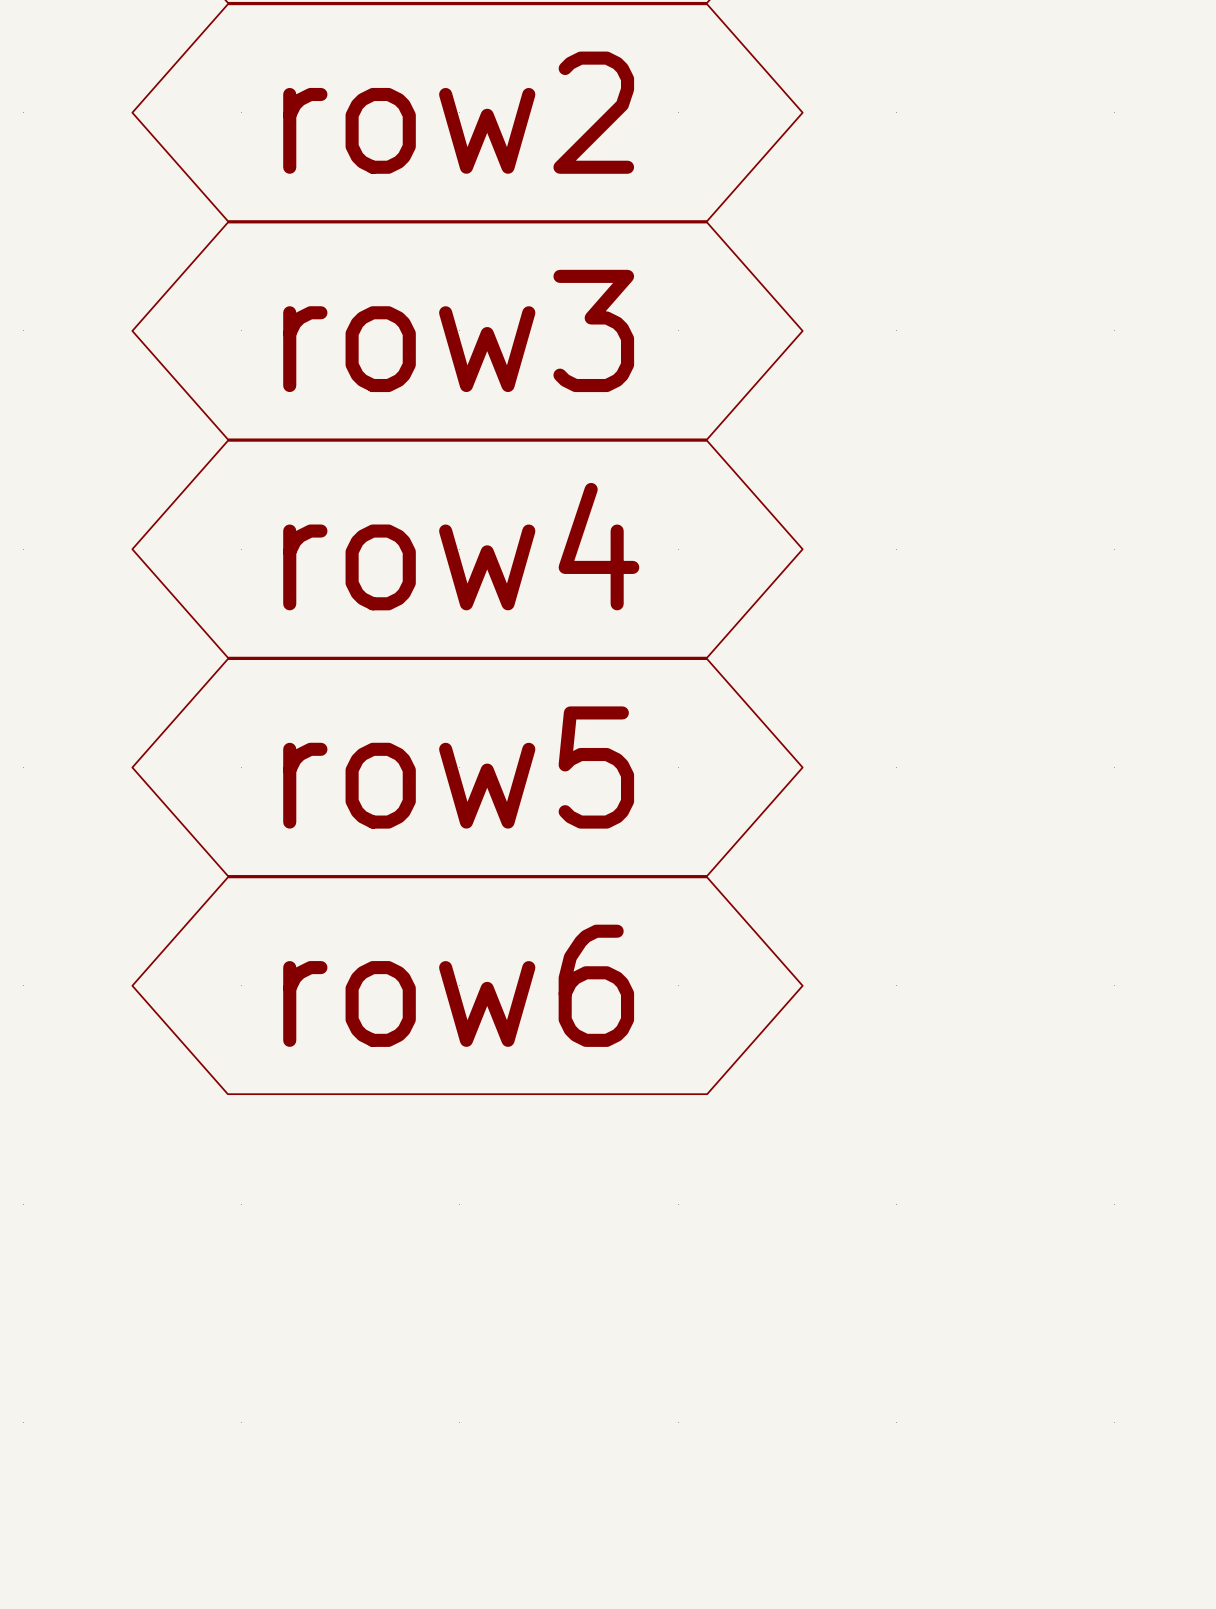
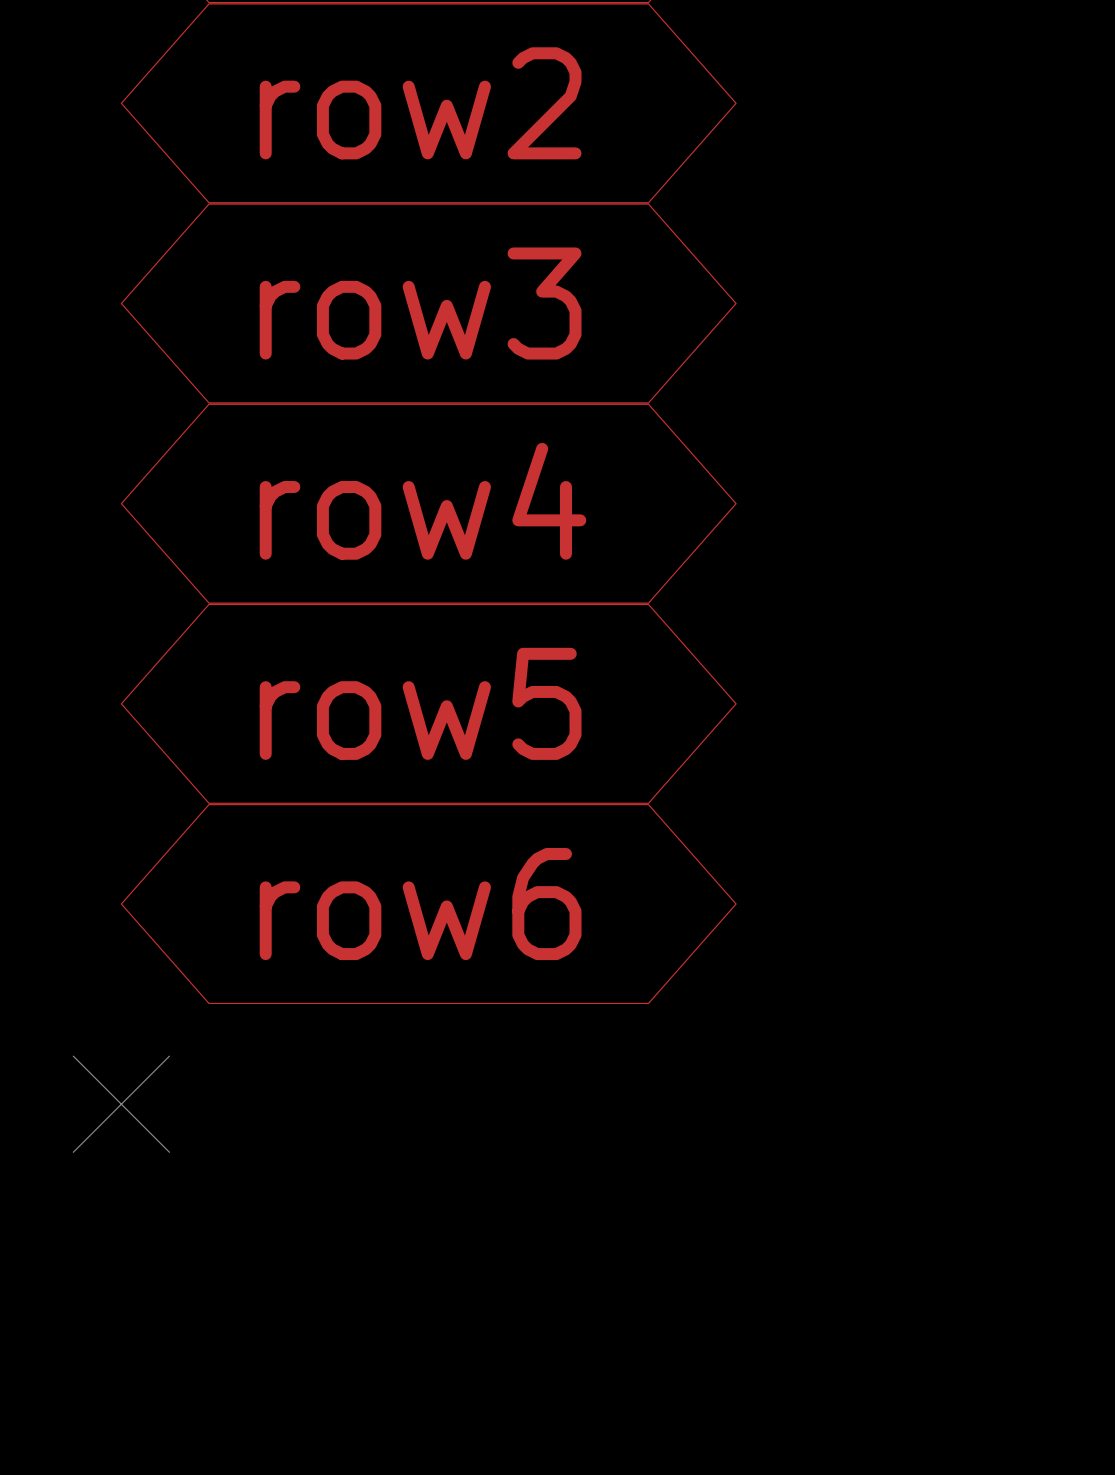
no-connect mark: none -> (121, 1104)

